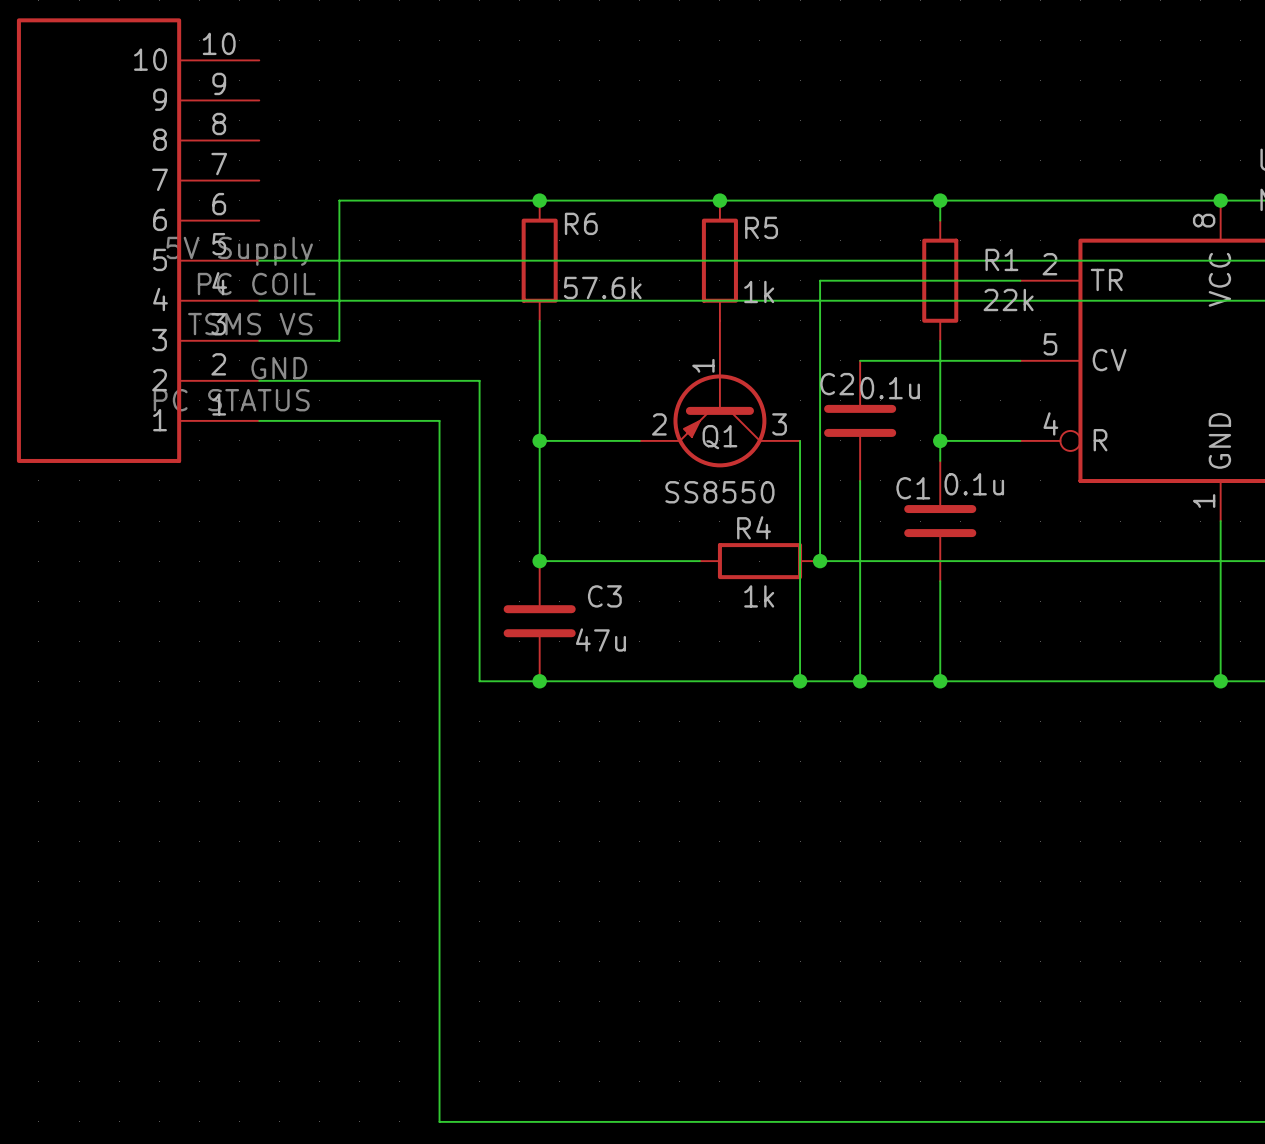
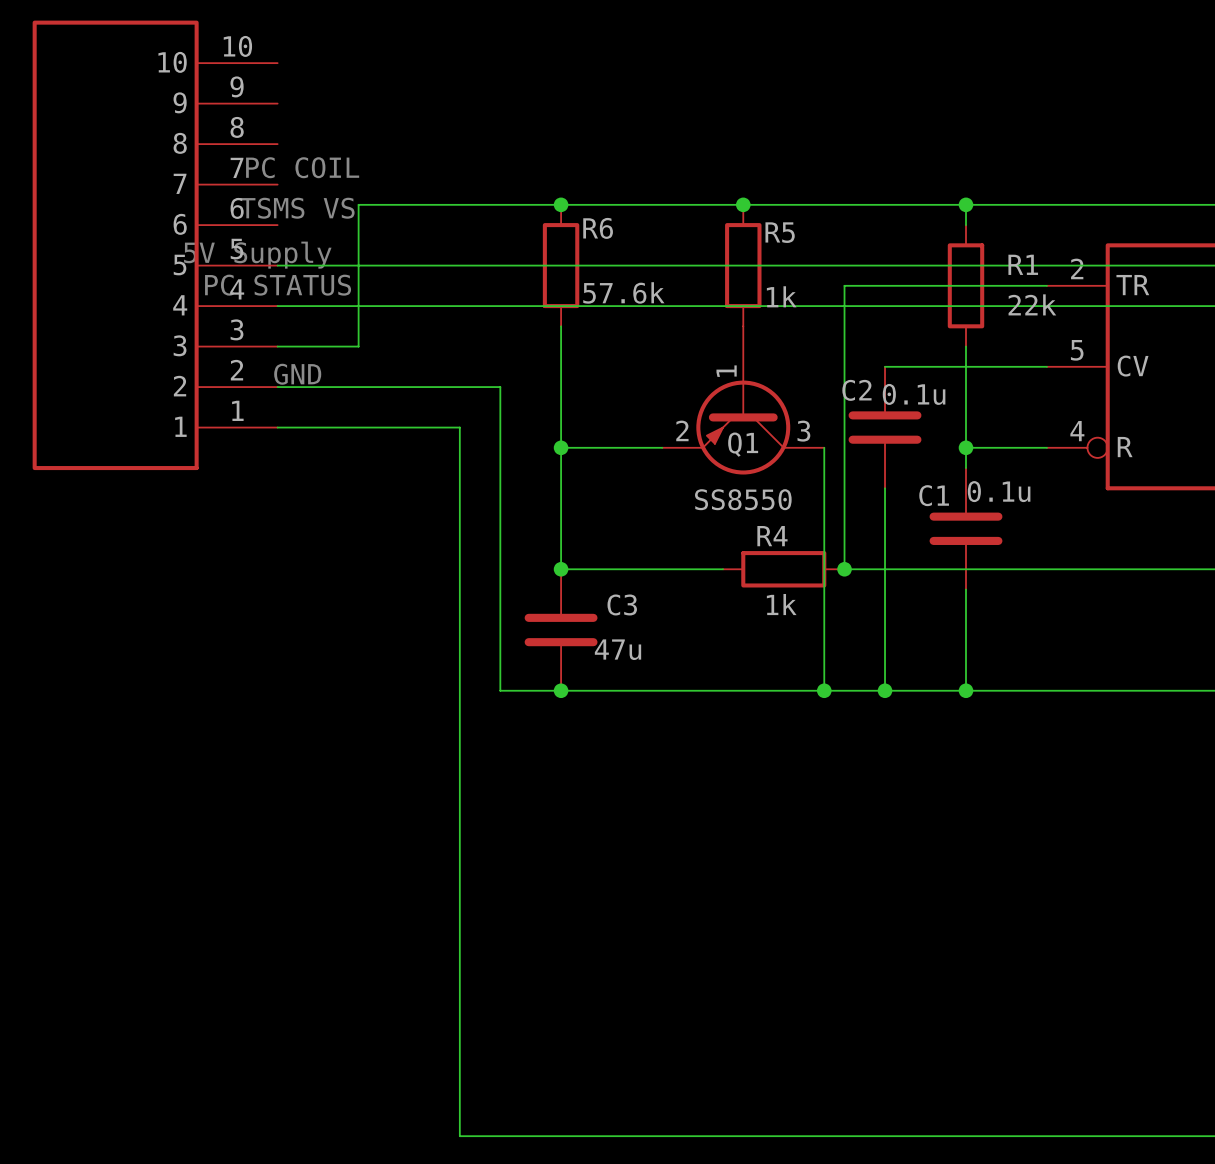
text position: PC COIL (256, 284) -> PC COIL (302, 167)
text position: TSMS VS (250, 324) -> TSMS VS (297, 208)
text position: PC STATUS (231, 400) -> PC STATUS (278, 285)

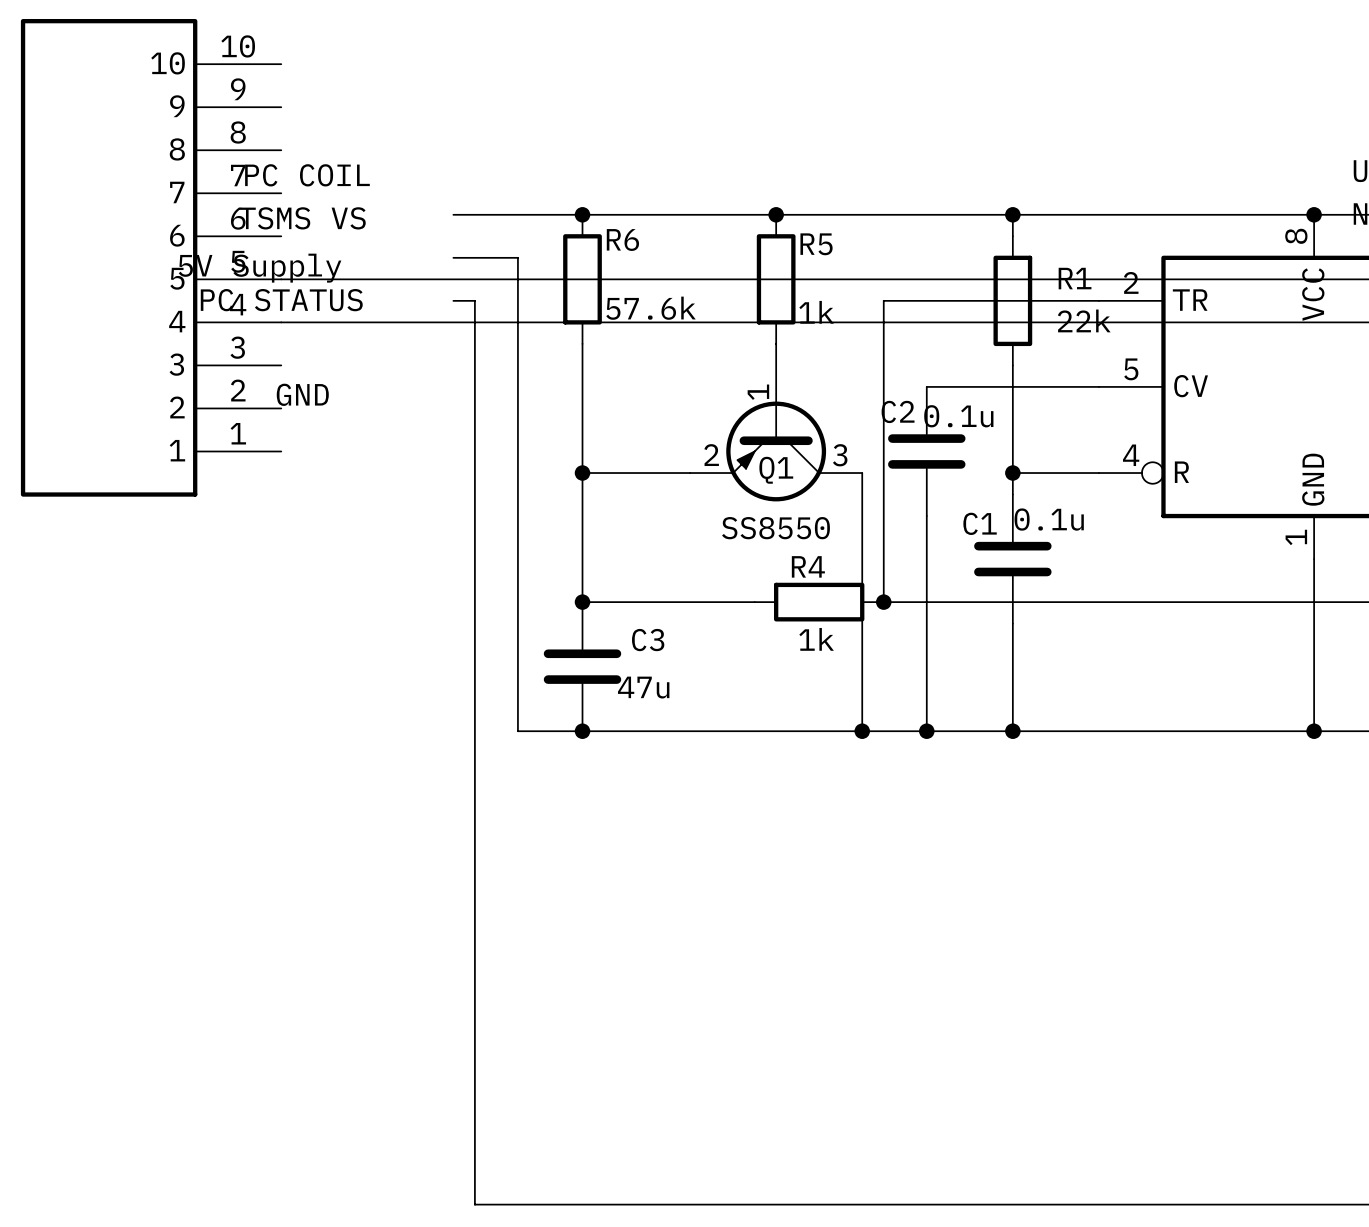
wire: (439, 204) (358, 204) (358, 346) (277, 346) -> none
wire: (277, 387) (500, 387) -> (453, 257) (517, 257) (517, 408)
wire: (277, 427) (459, 427) -> (453, 300) (474, 300) (474, 451)

